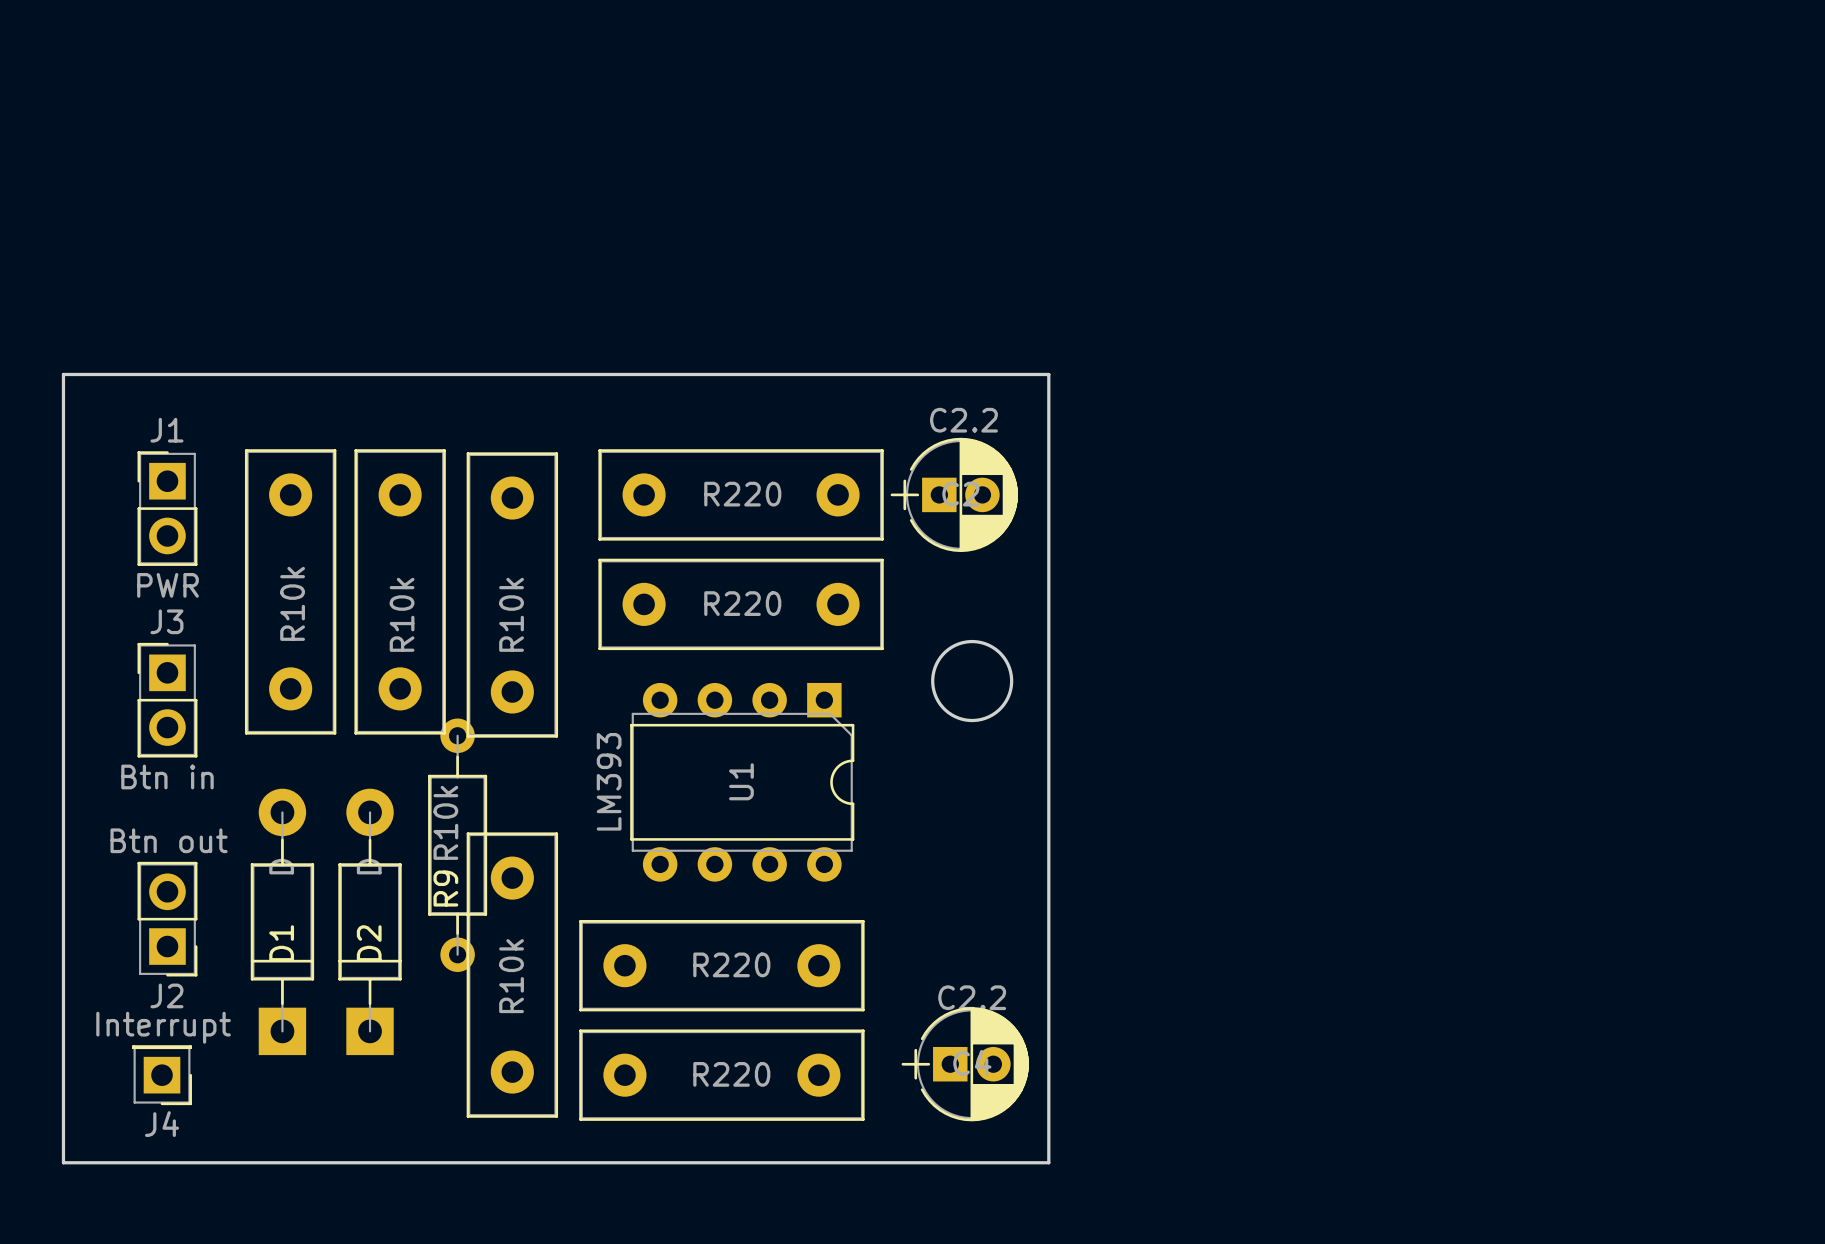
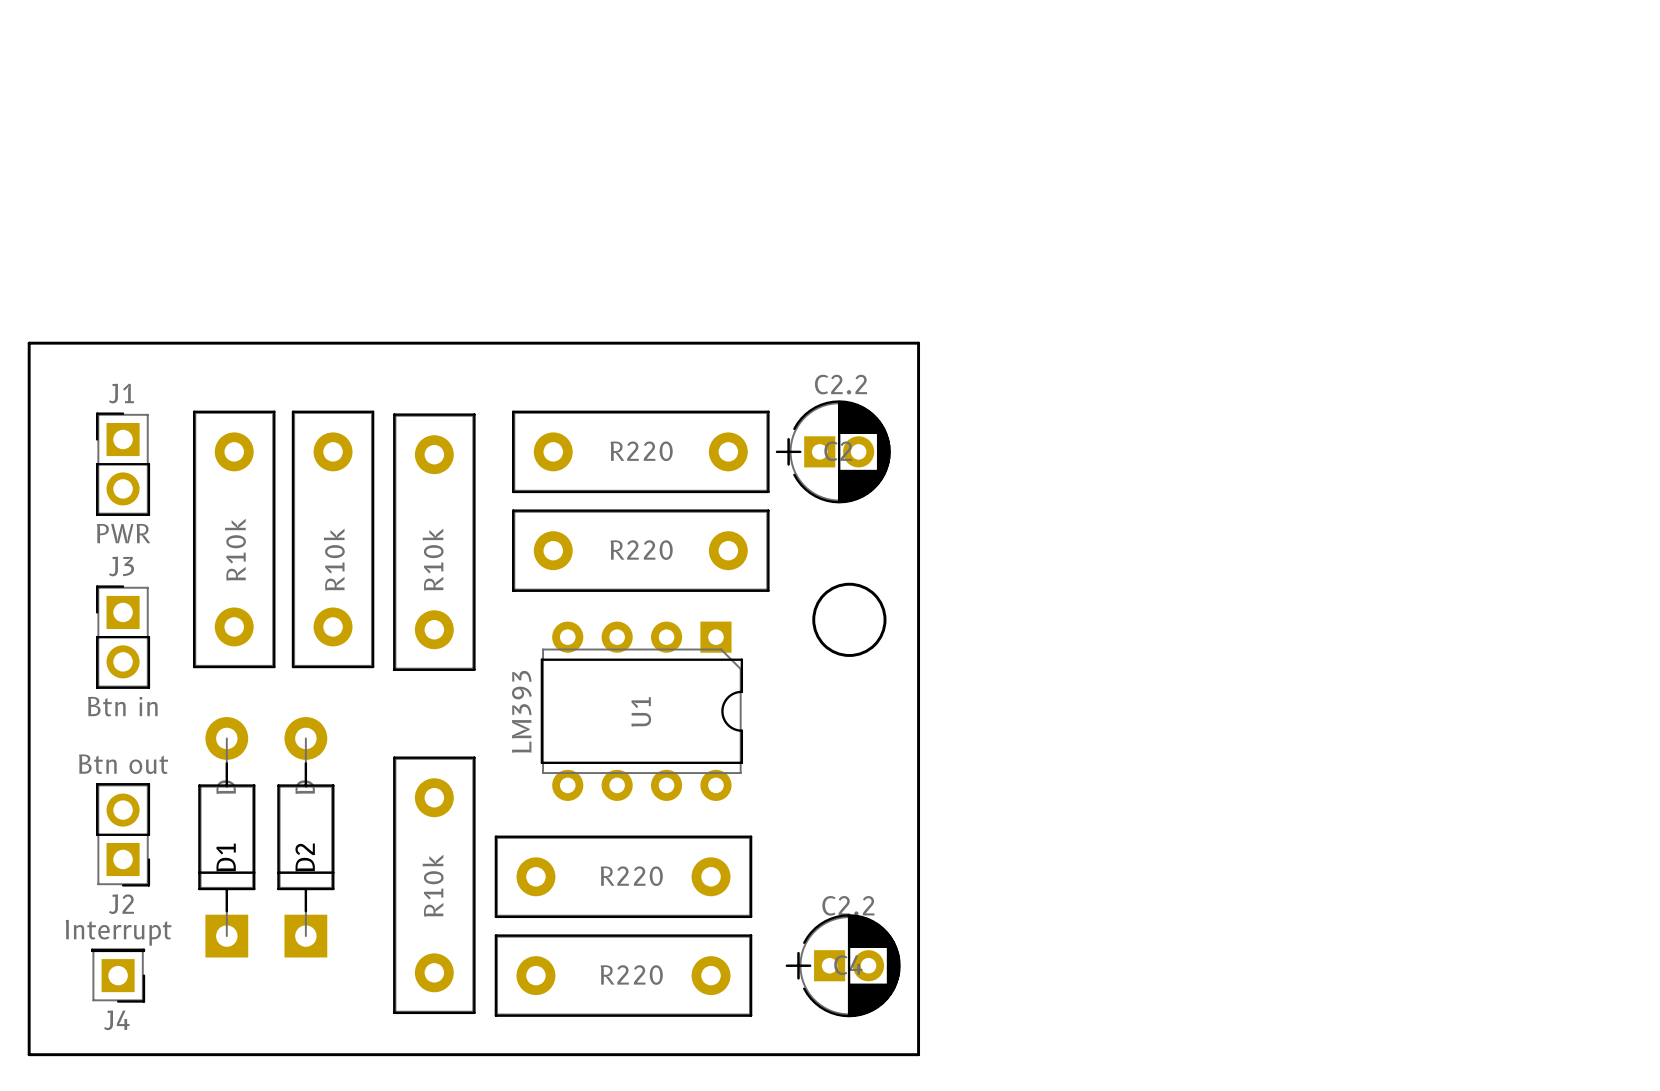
R9: R10k (457, 845) -> none

